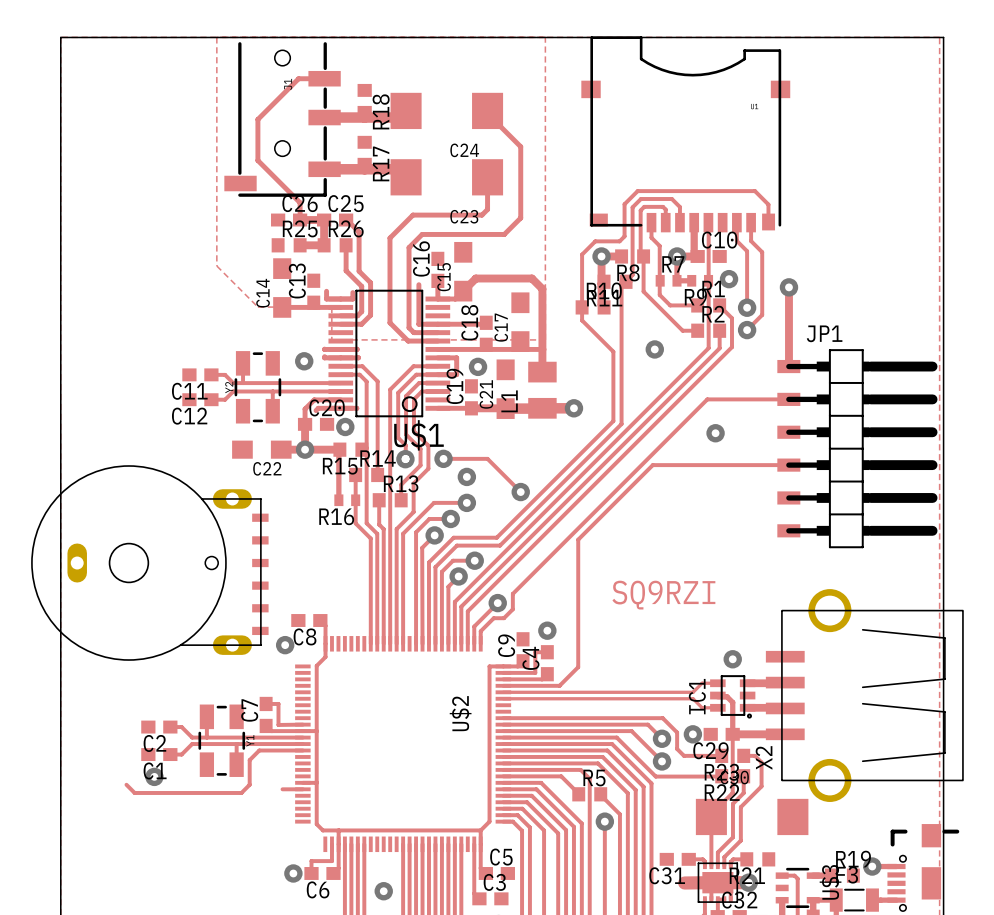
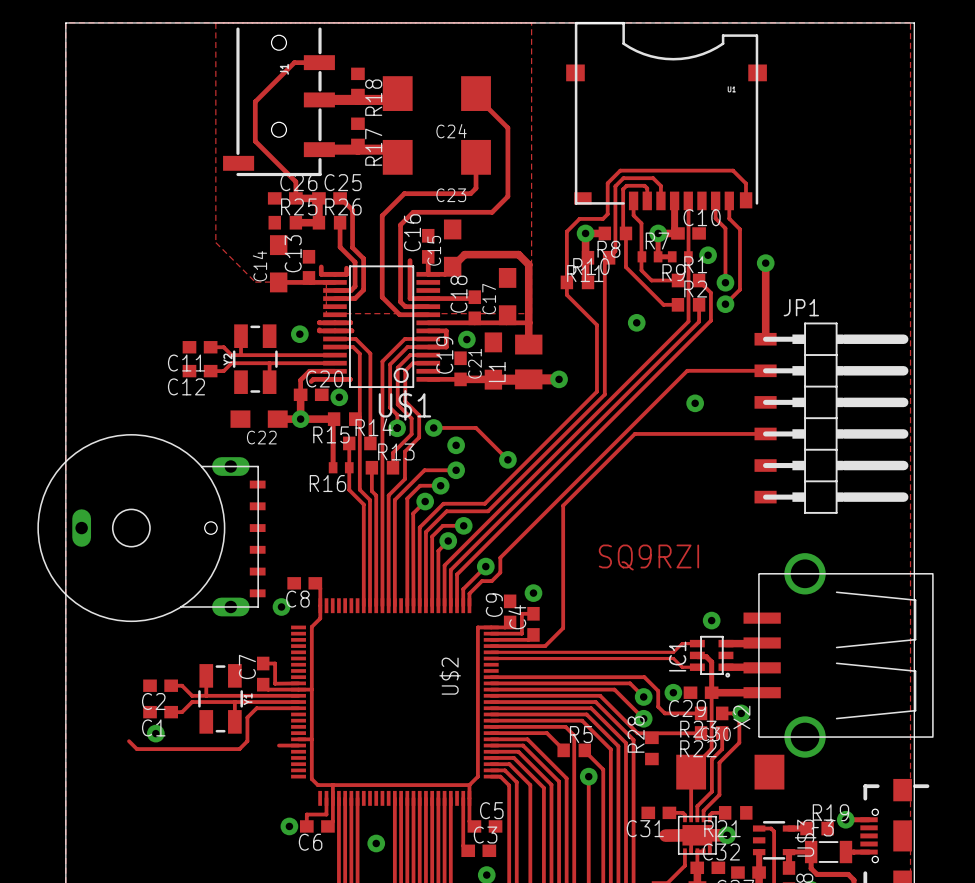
via: none -> (741, 713)
R28: none -> (651, 748)

